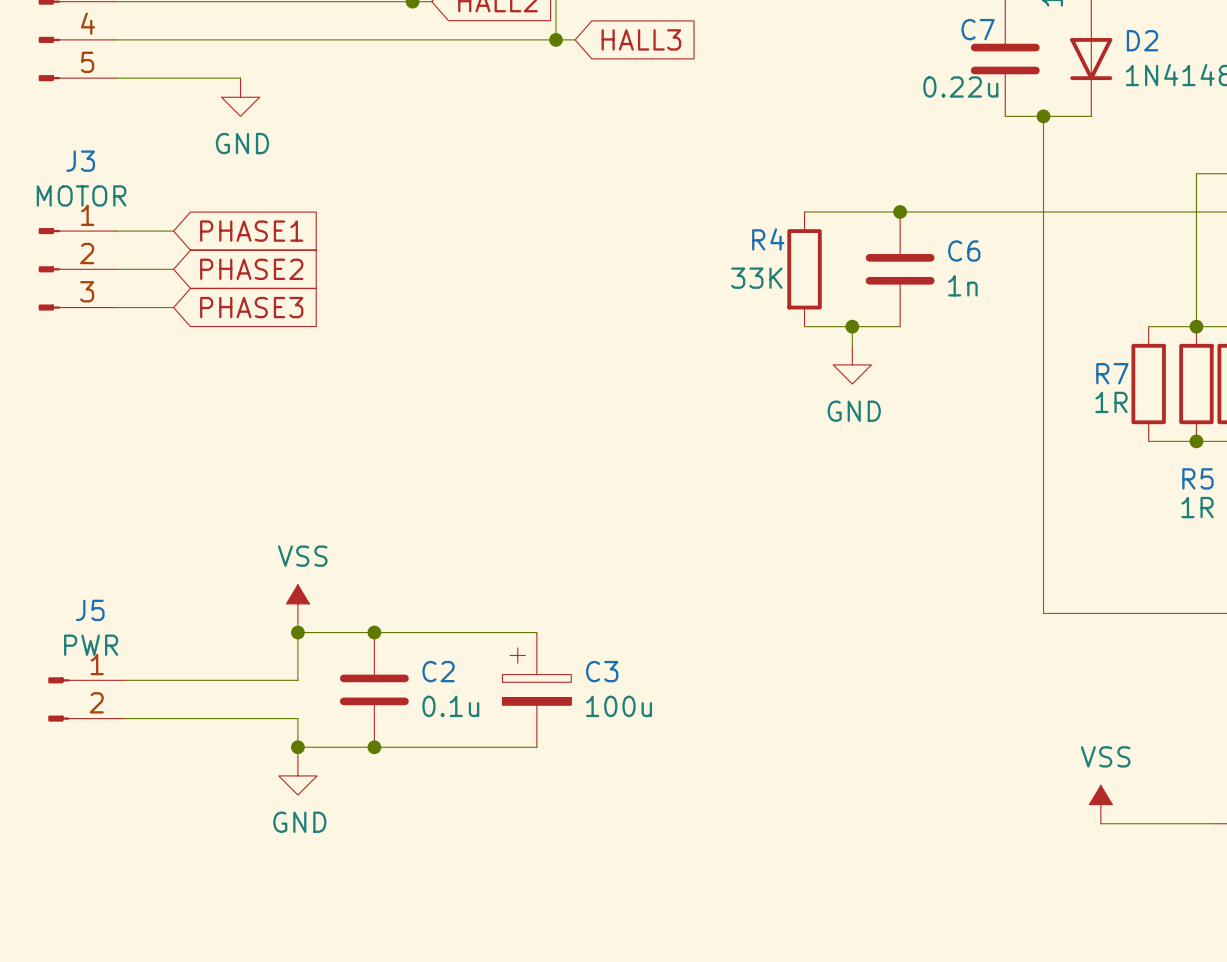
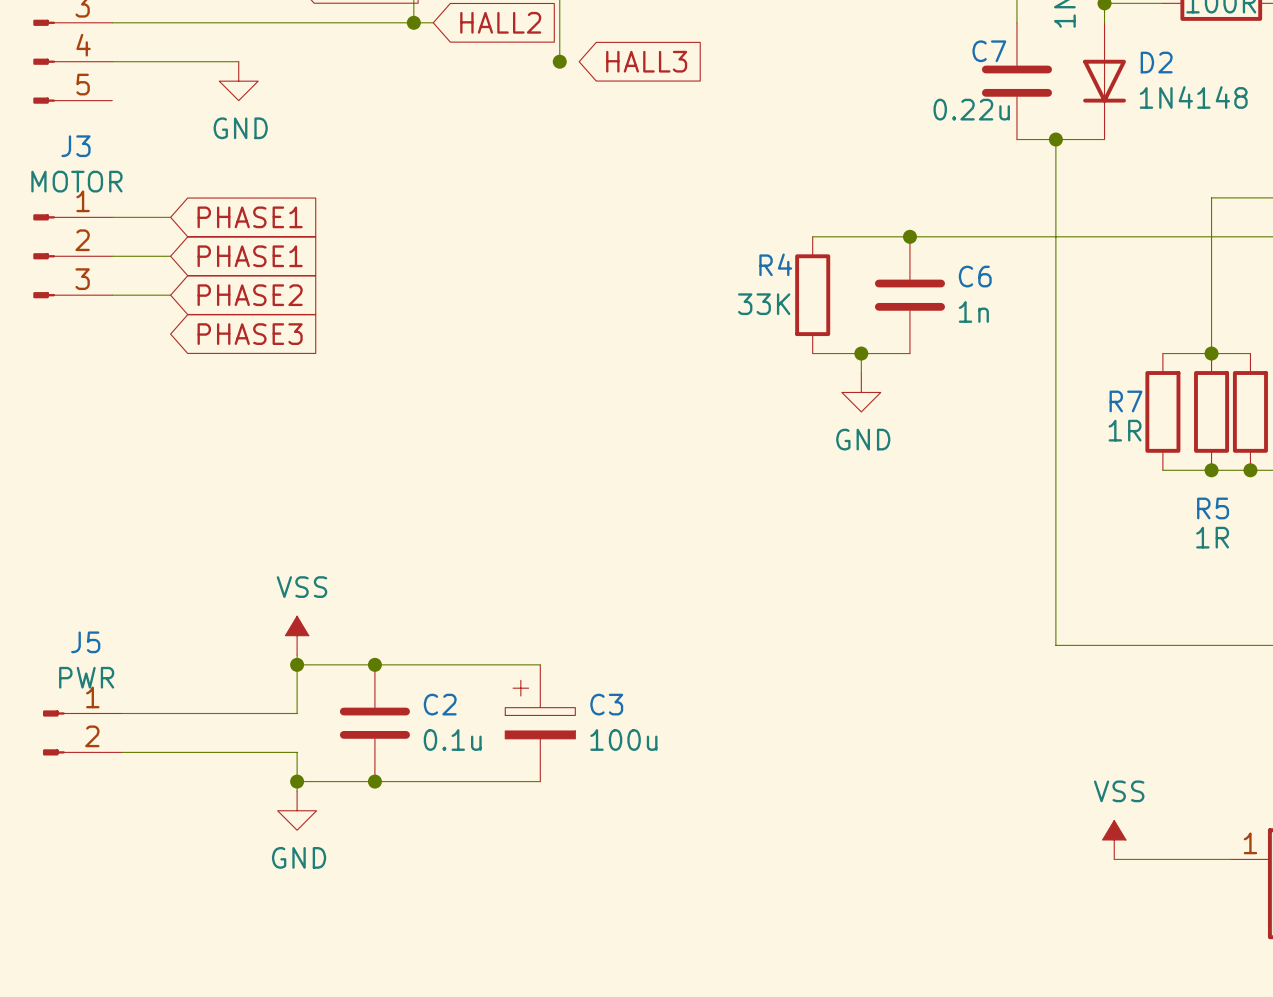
wire: (240, 39) (575, 39) -> none
wire: (116, 78) (240, 78) -> none
power symbol position: GND (240, 97) -> GND (238, 81)
global label: none -> PHASE1 (250, 217)
J3 position: (77, 269) -> (72, 256)
wire: (116, 307) (173, 307) -> (112, 217) (170, 217)

